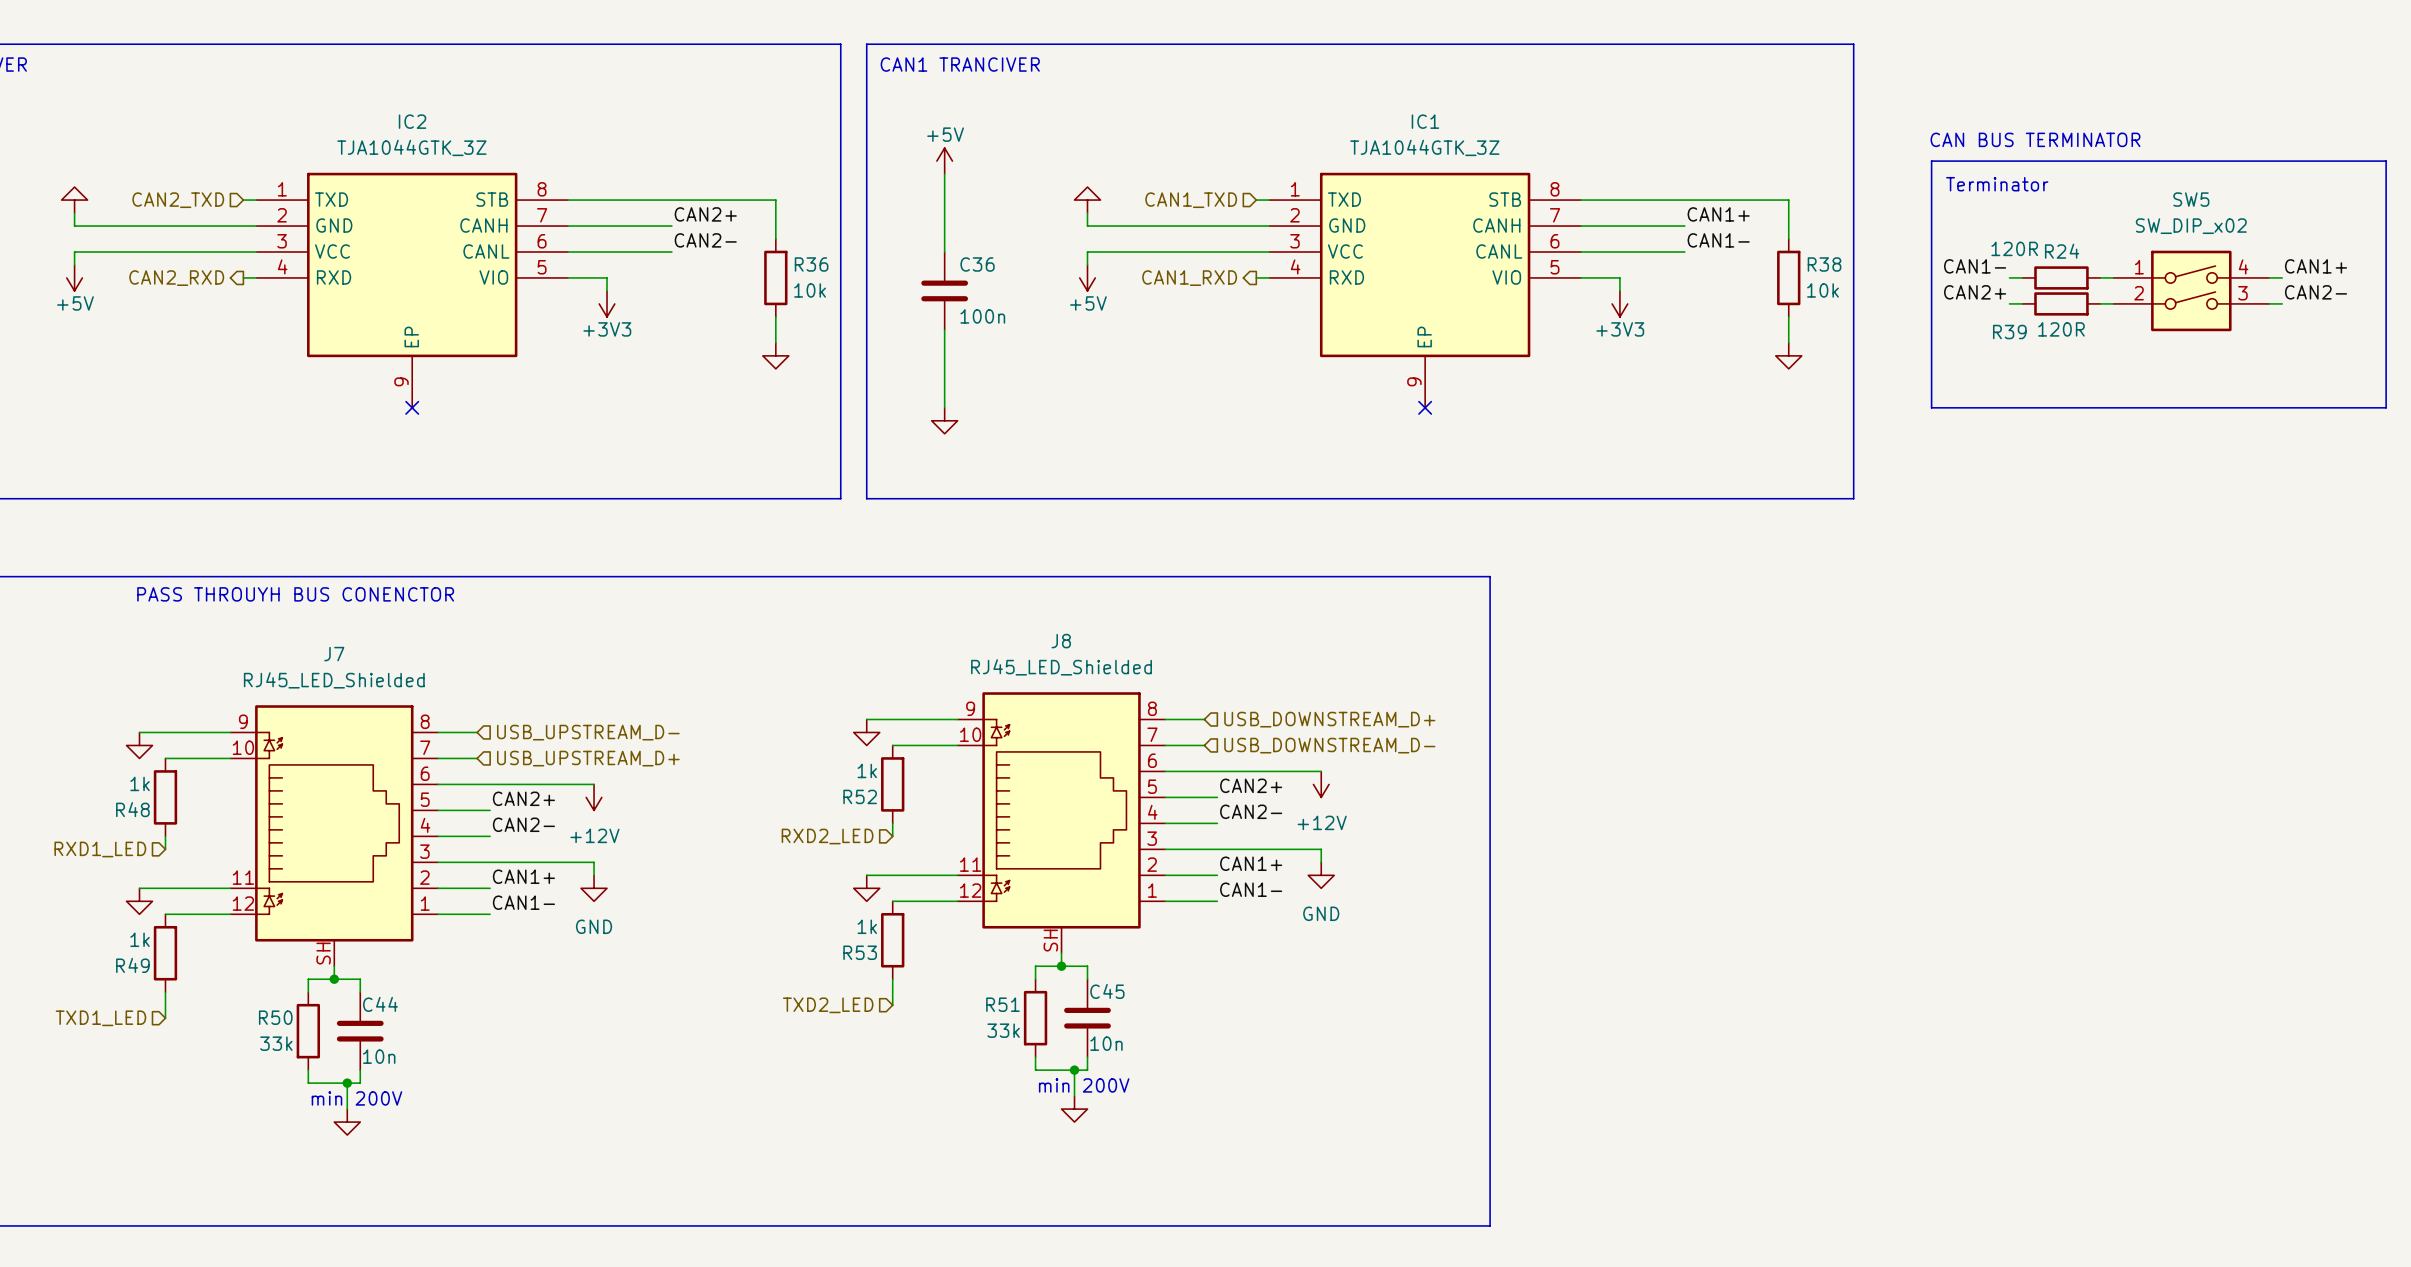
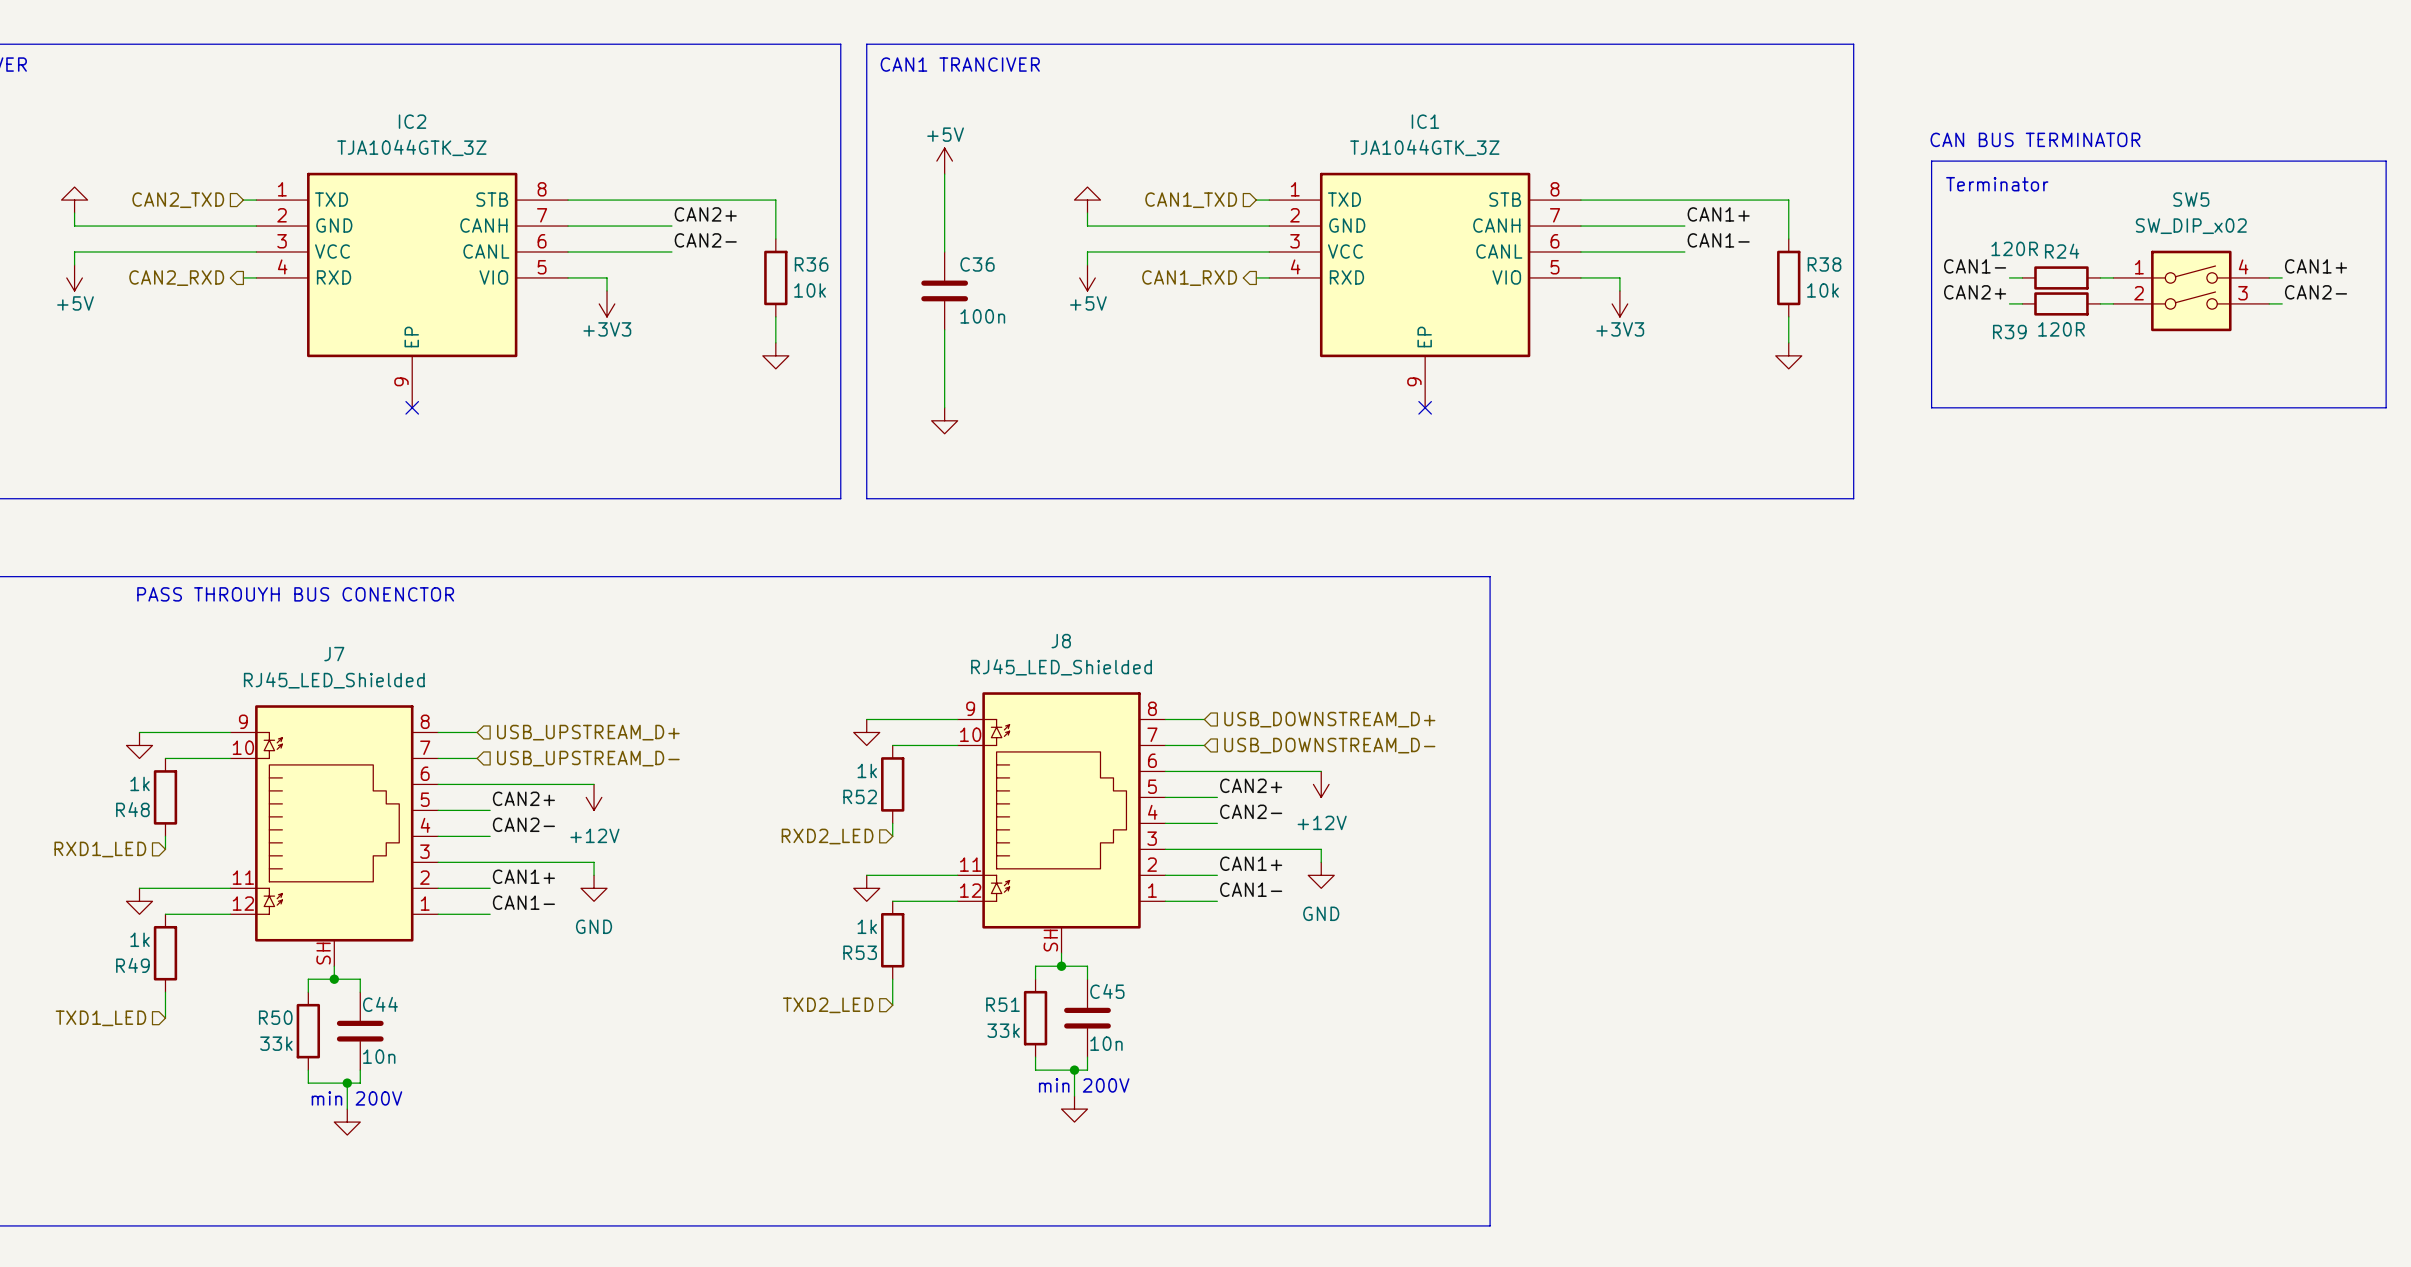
hierarchical label: USB_UPSTREAM_D- (588, 732) -> USB_UPSTREAM_D+ (588, 732)
hierarchical label: USB_UPSTREAM_D+ (588, 758) -> USB_UPSTREAM_D- (588, 758)

